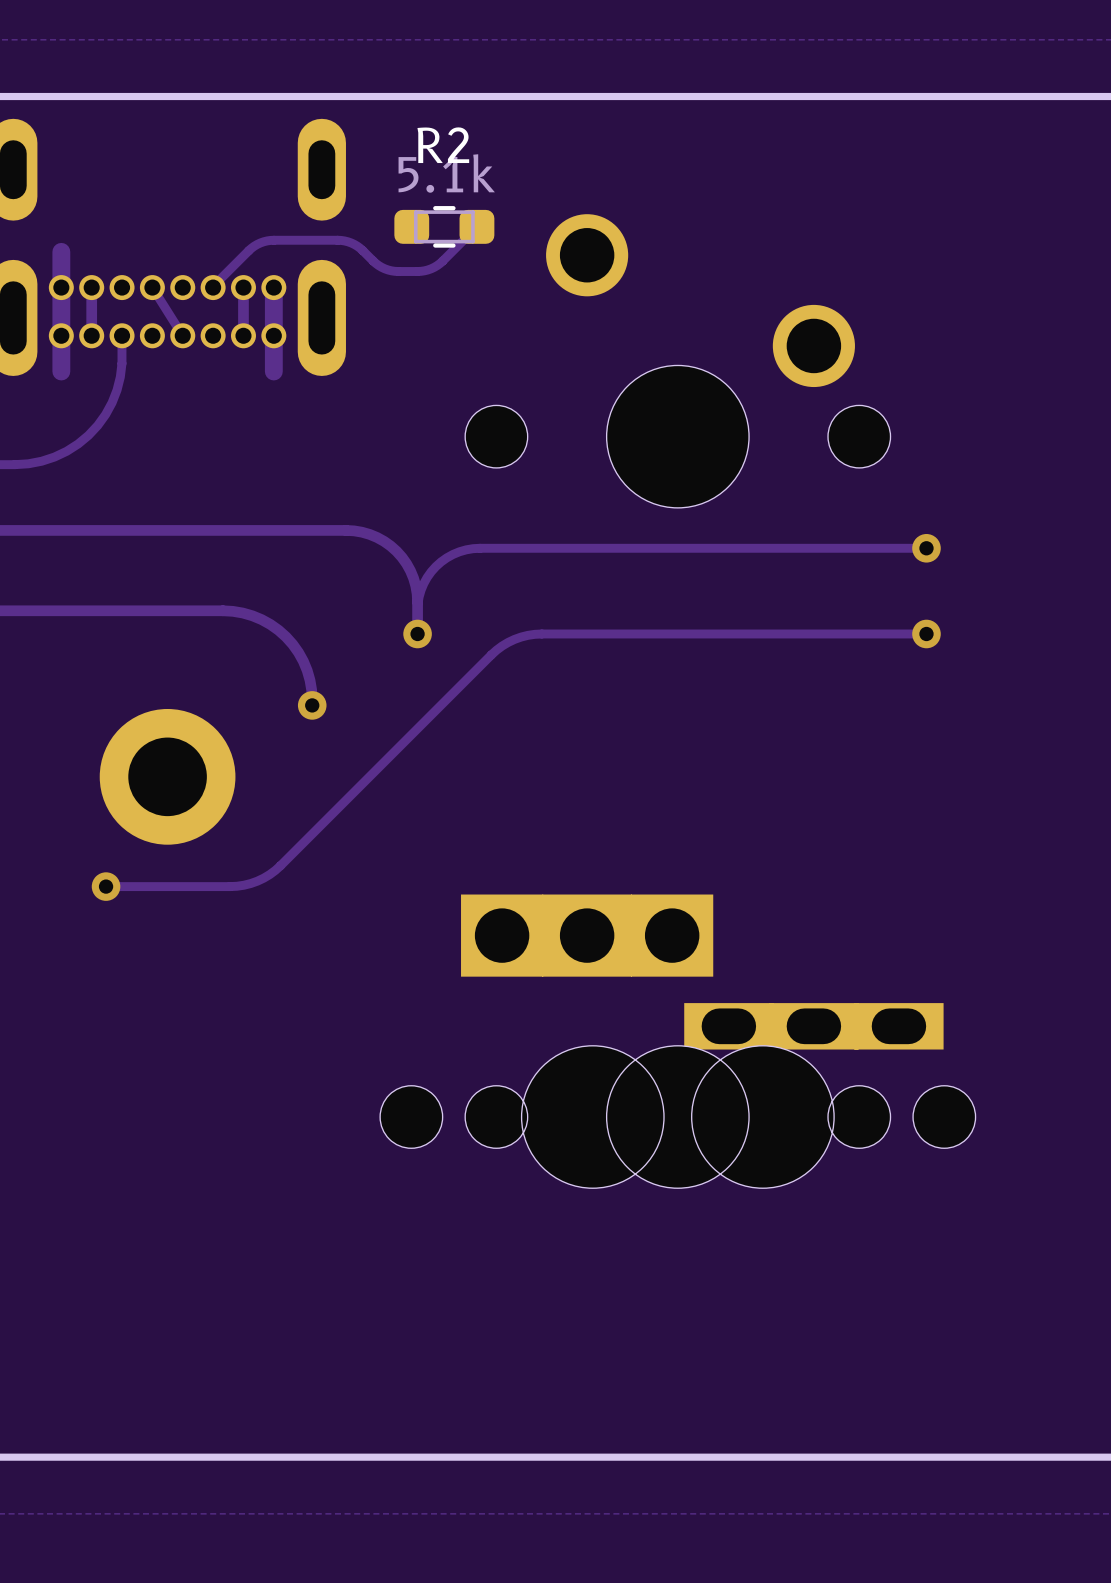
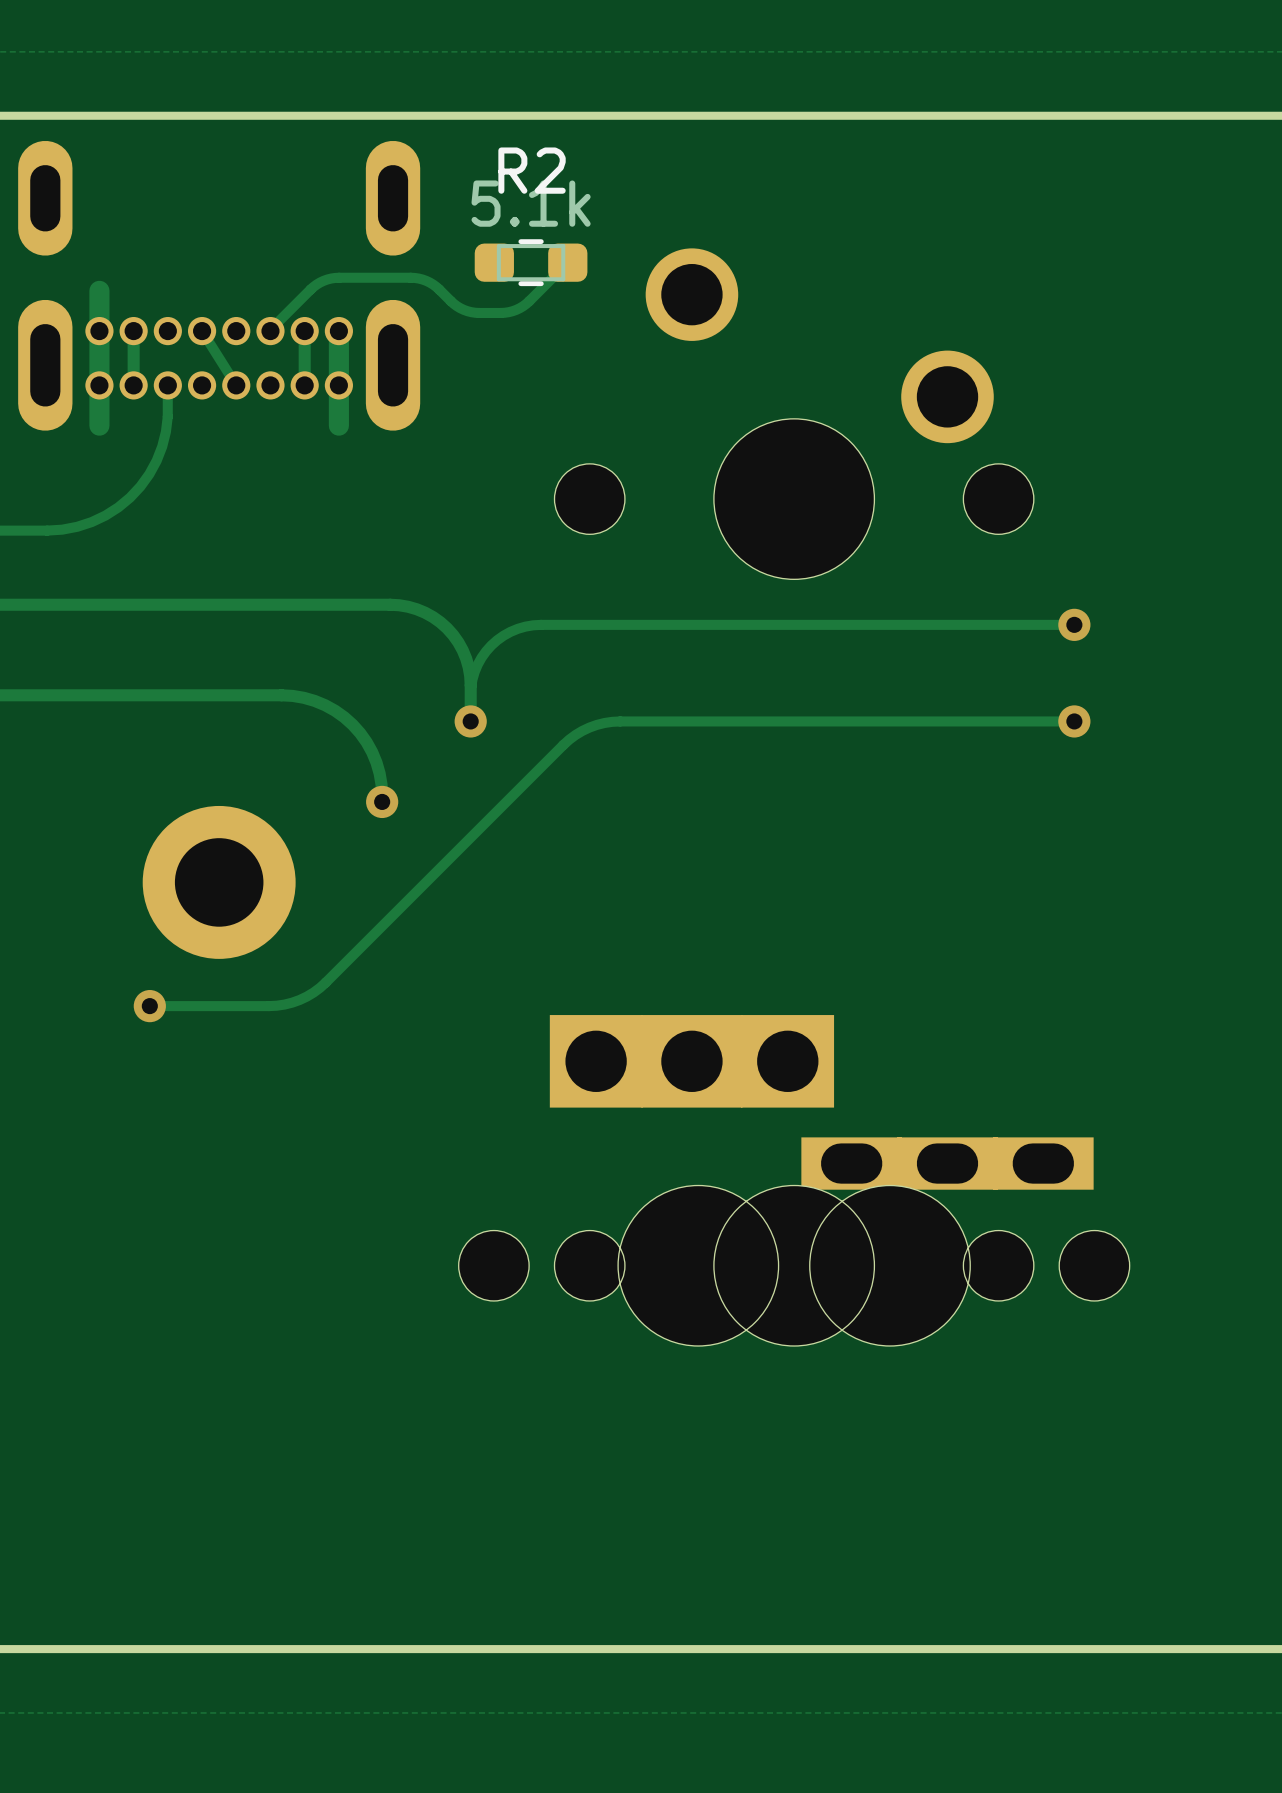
track: (319, 530) (362, 532) (384, 541) (396, 551) (410, 570) (415, 585) (417, 633) (419, 596) (423, 583) (431, 571) (441, 561) (452, 554) (466, 549) (480, 548) -> (390, 604) (408, 606) (425, 612) (440, 622) (458, 642) (466, 658) (470, 676) (470, 721) (472, 679) (481, 657) (491, 645) (510, 631) (525, 626) (571, 624)
via position: (417, 633) -> (470, 721)
track: (541, 633) (521, 637) (496, 650) (275, 870) (250, 883) (237, 886) (211, 886) -> (640, 721) (612, 721) (596, 724) (582, 730) (569, 739) (319, 987) (299, 999) (284, 1004) (268, 1006)

